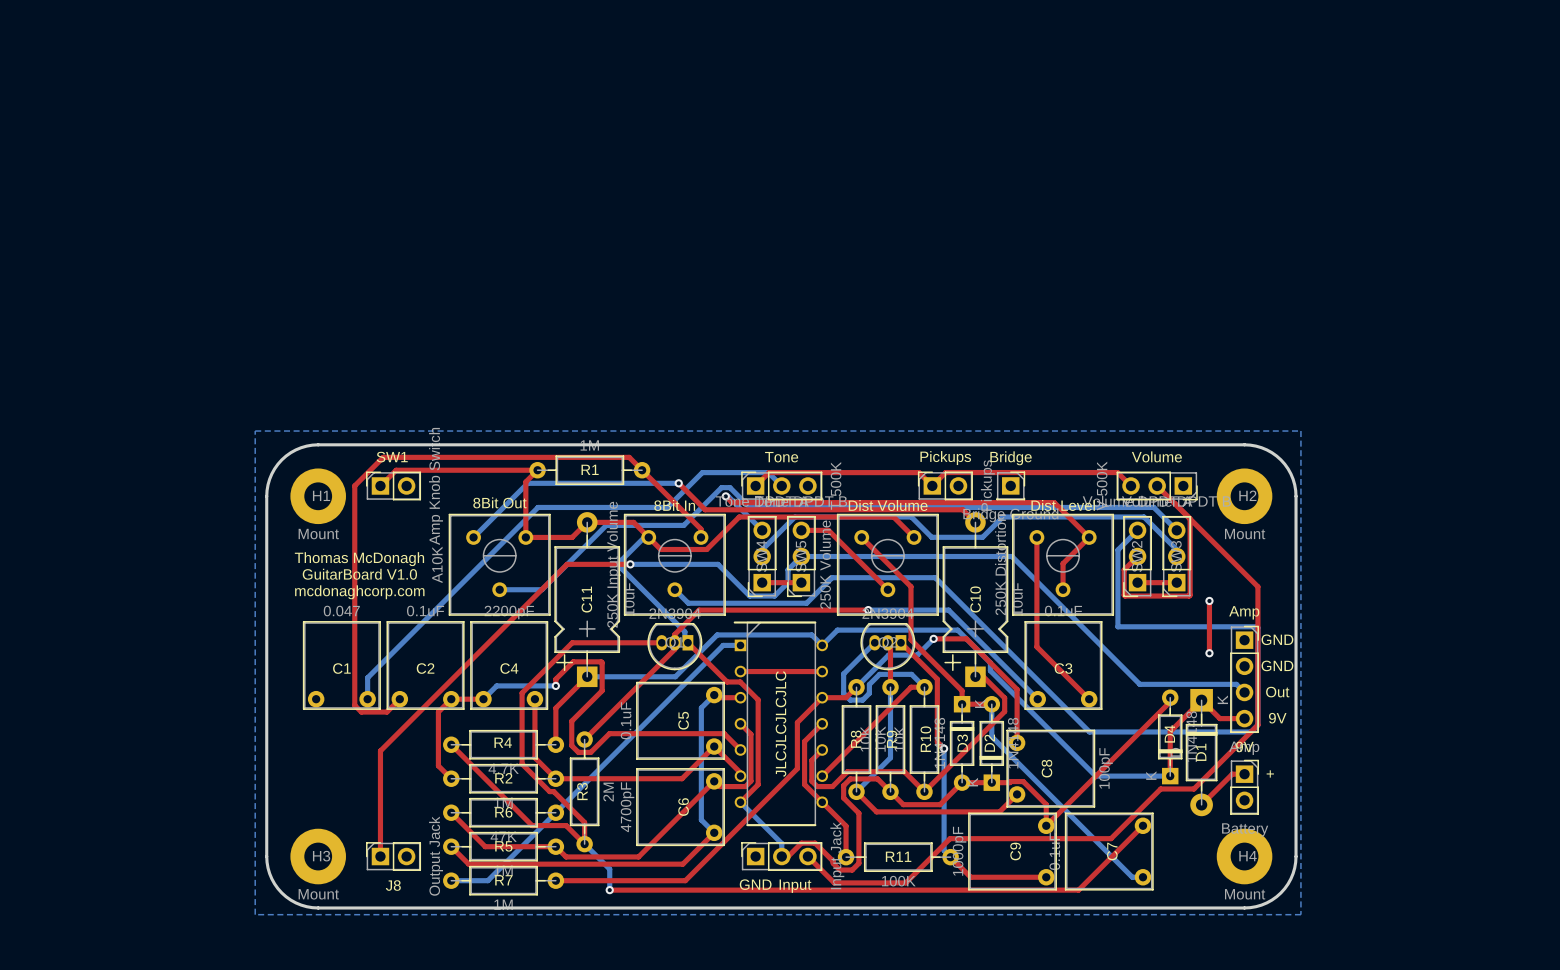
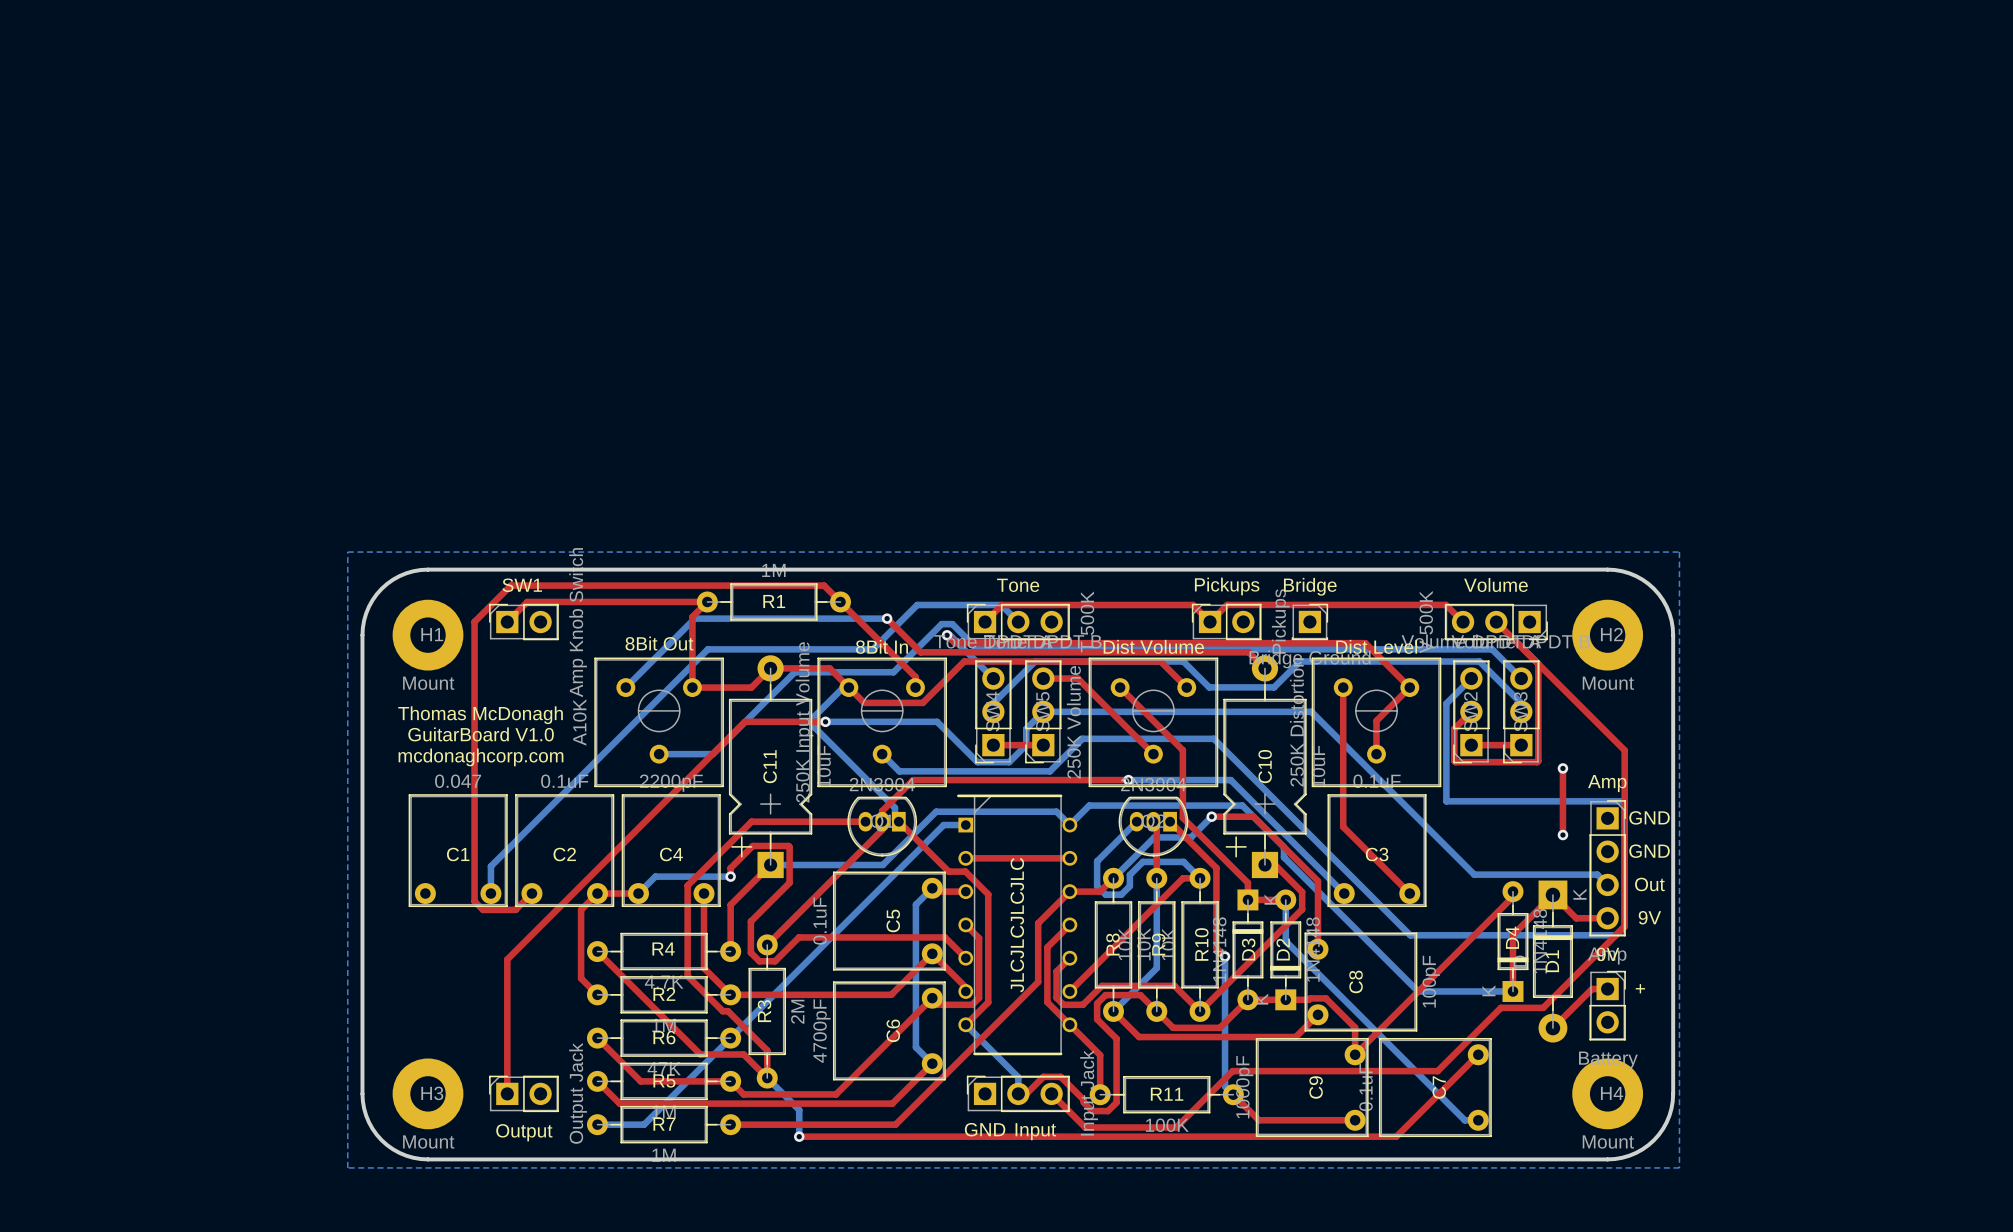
J8 name: J8 (393, 885) -> Output (524, 1132)

